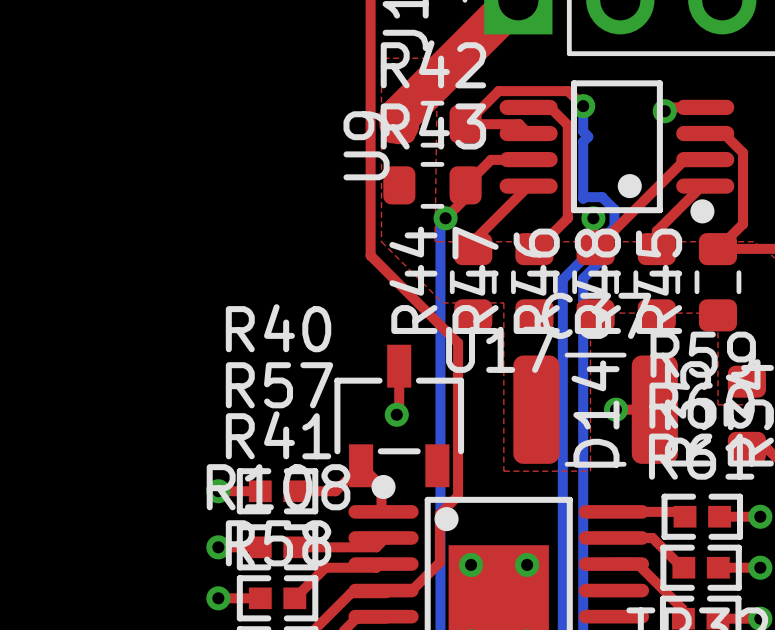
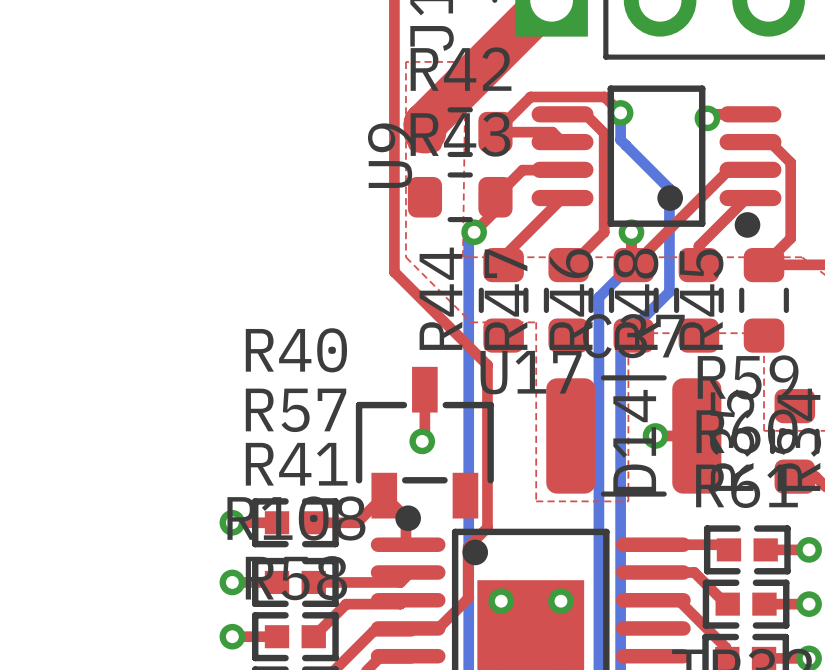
bottom track: (588, 136) (583, 141) (583, 198) (602, 197) (614, 209) (614, 227) (607, 234) (607, 254) (583, 278) (583, 320) -> (626, 145) (669, 188) (669, 291) (620, 340)

